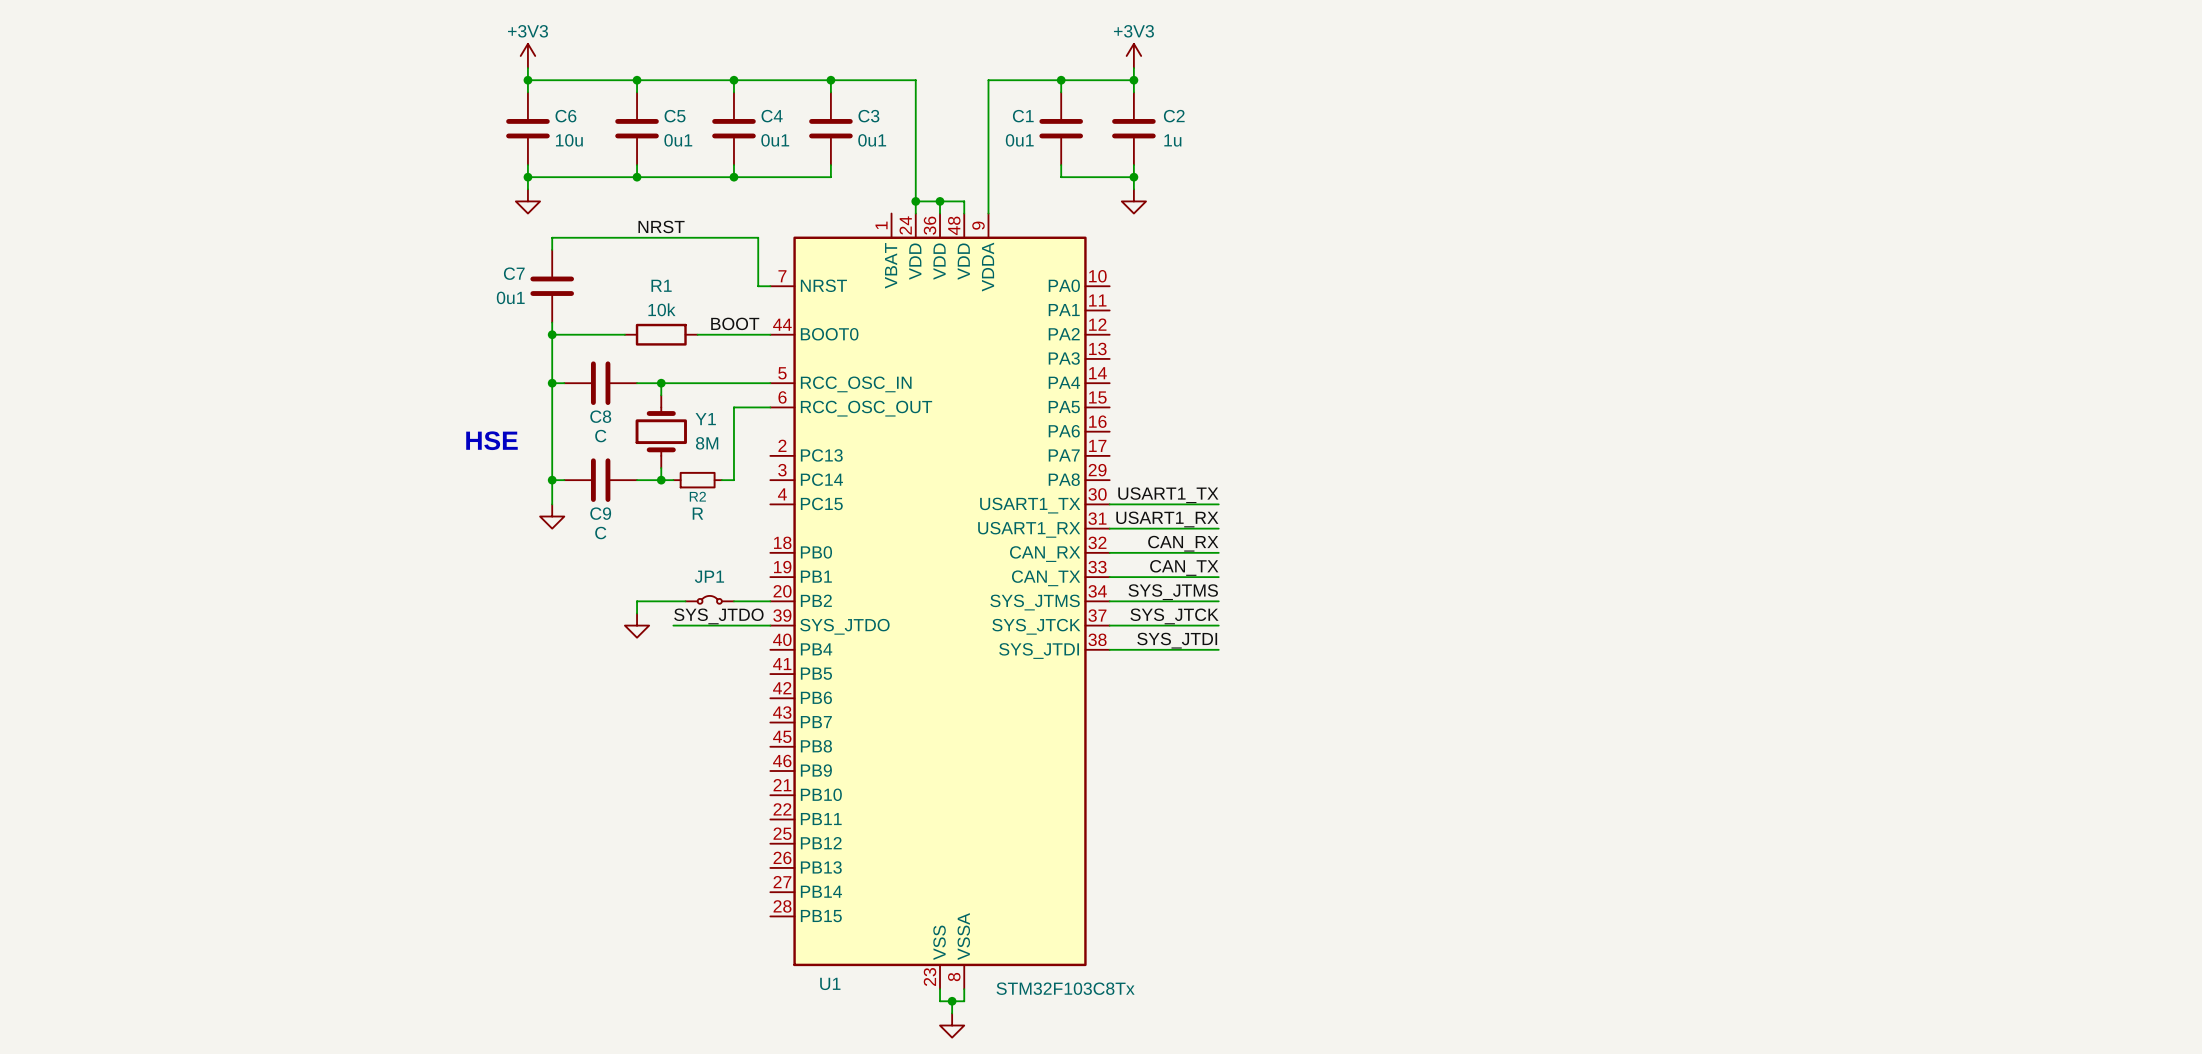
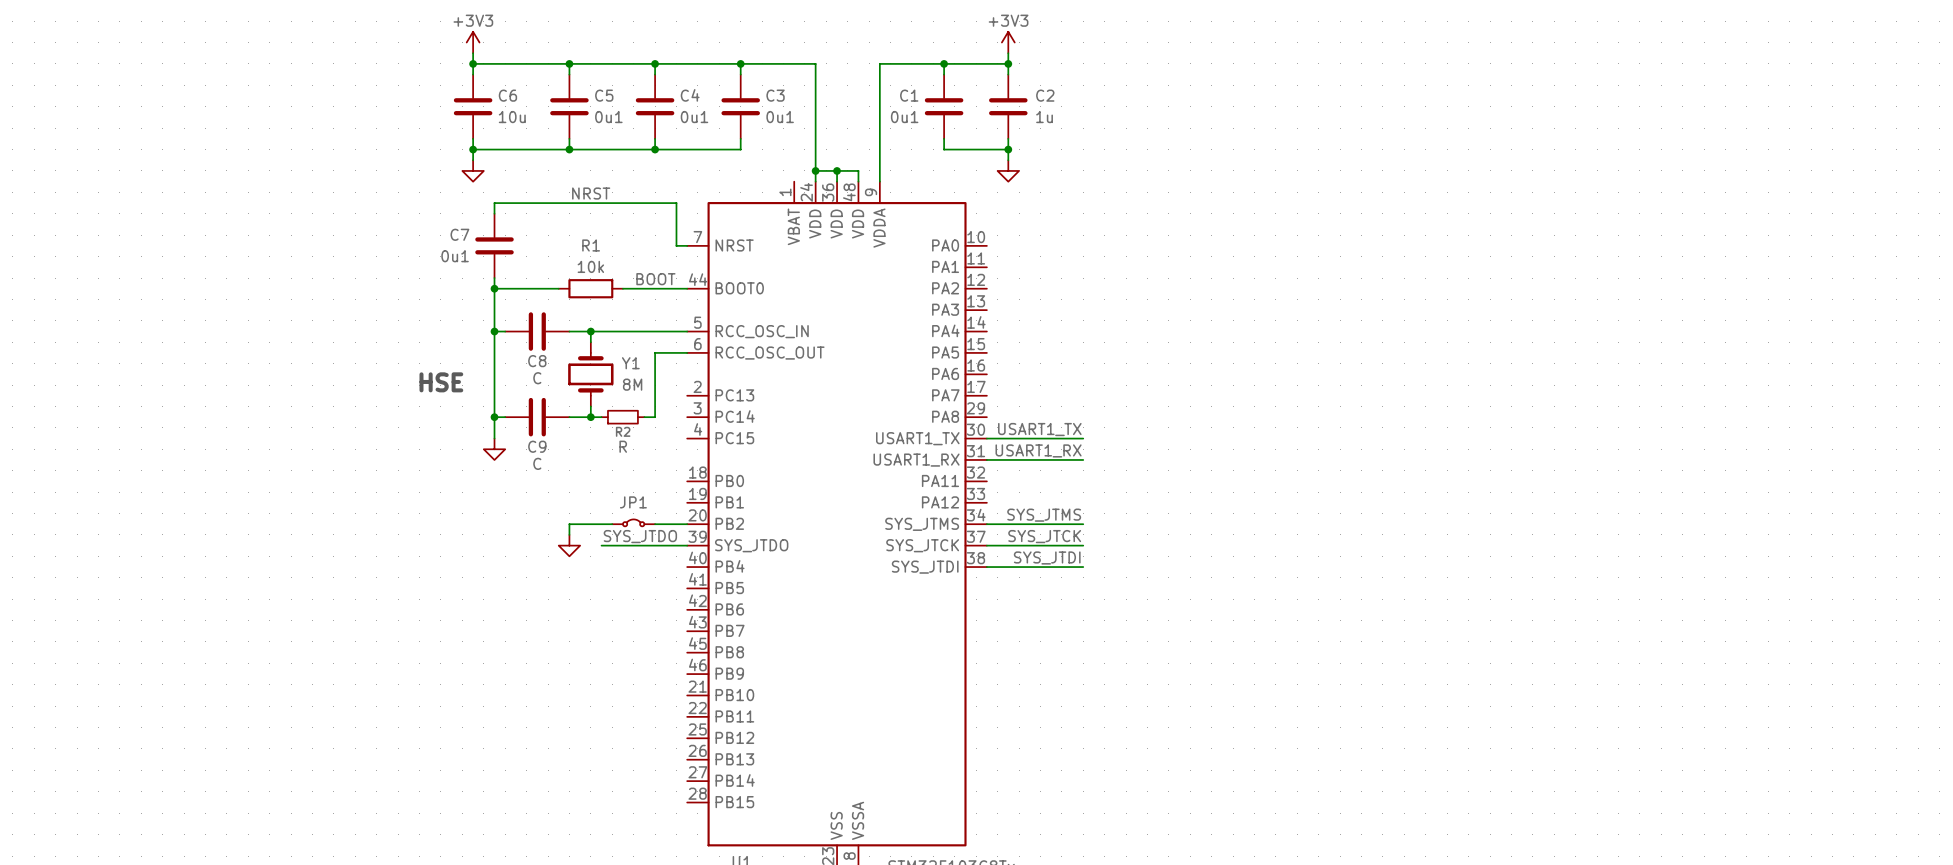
label: CAN_RX (1183, 543) -> none
wire: (1109, 552) (1218, 552) -> none
U1 pin name: CAN_RX (1045, 554) -> PA11 (940, 480)
label: CAN_TX (1184, 567) -> none
wire: (1109, 577) (1218, 577) -> none
U1 pin name: CAN_TX (1046, 578) -> PA12 (940, 502)

